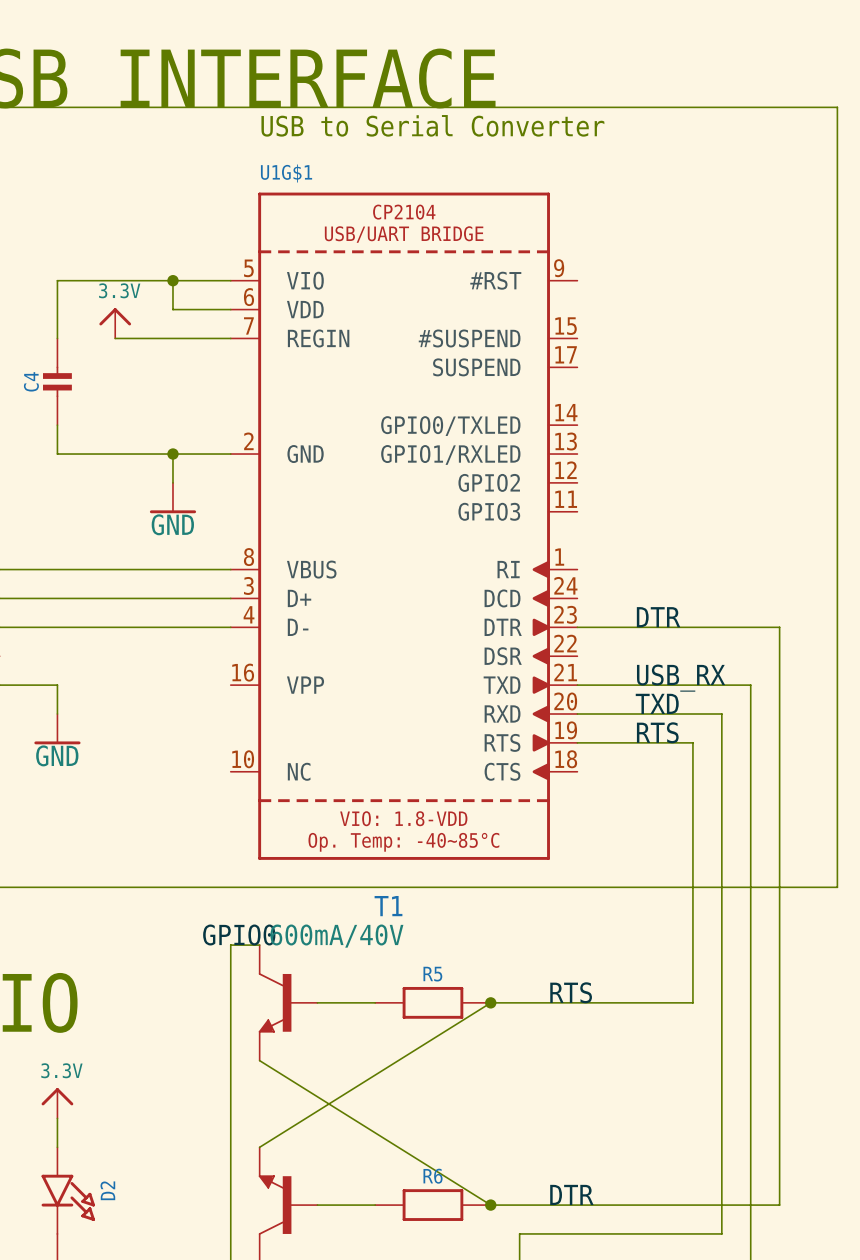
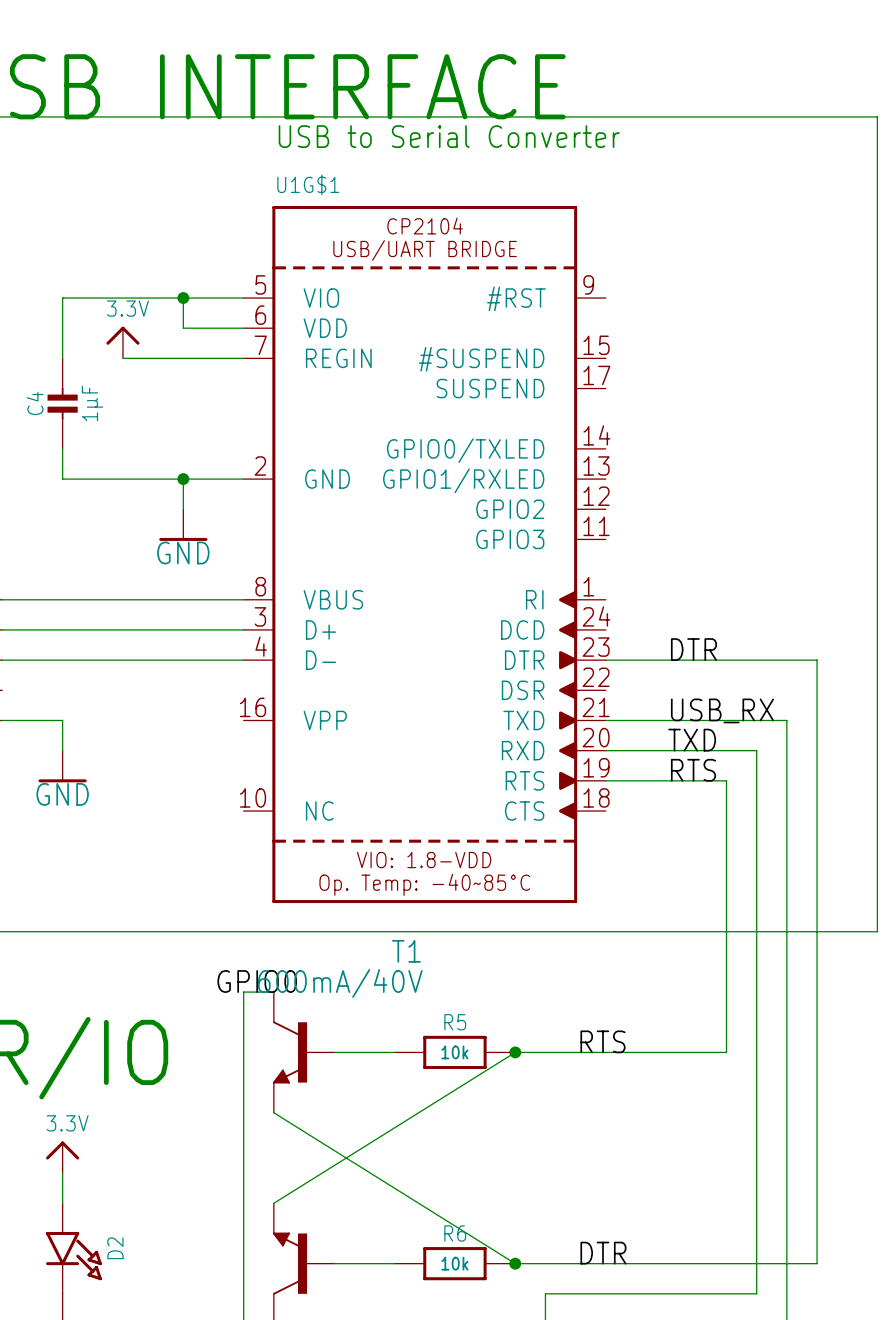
C4 value: none -> 1µF (92, 403)
R5 value: none -> 10k (454, 1052)
R6 value: none -> 10k (454, 1263)

